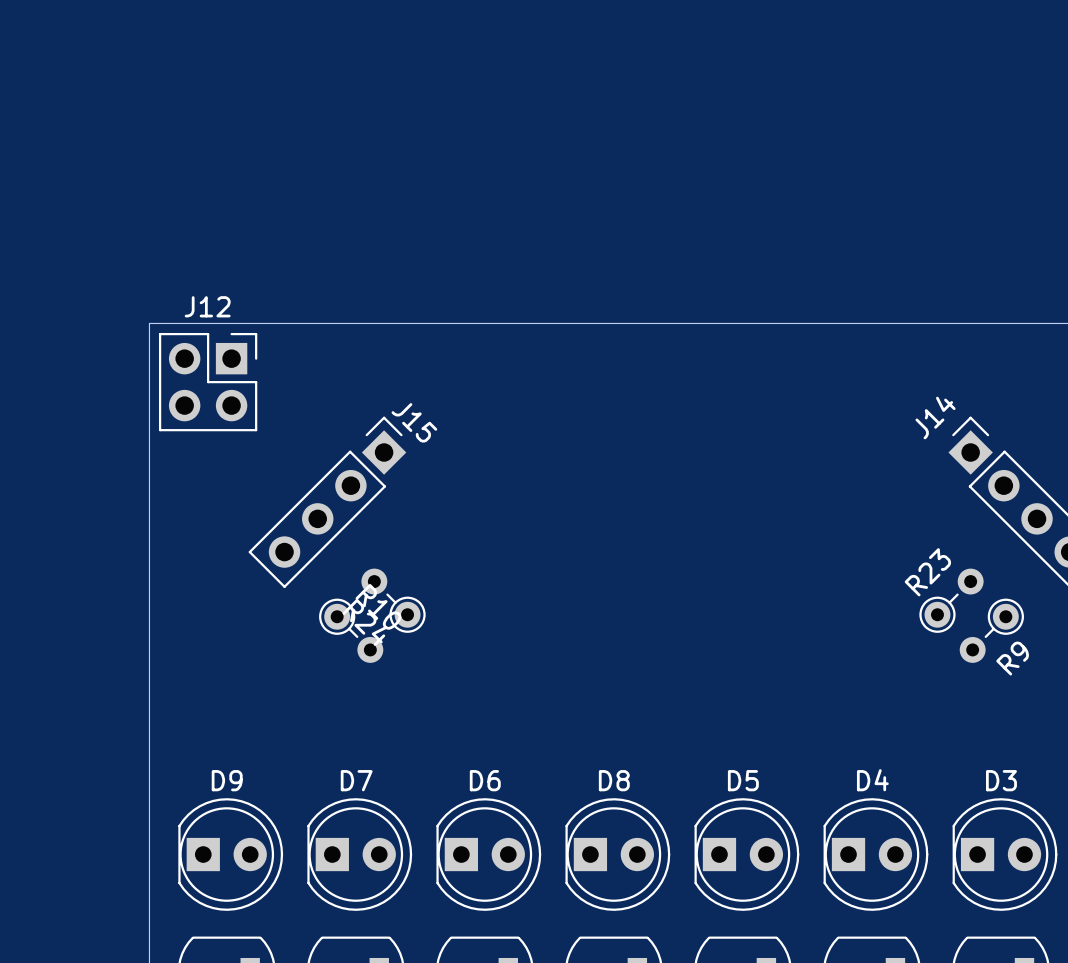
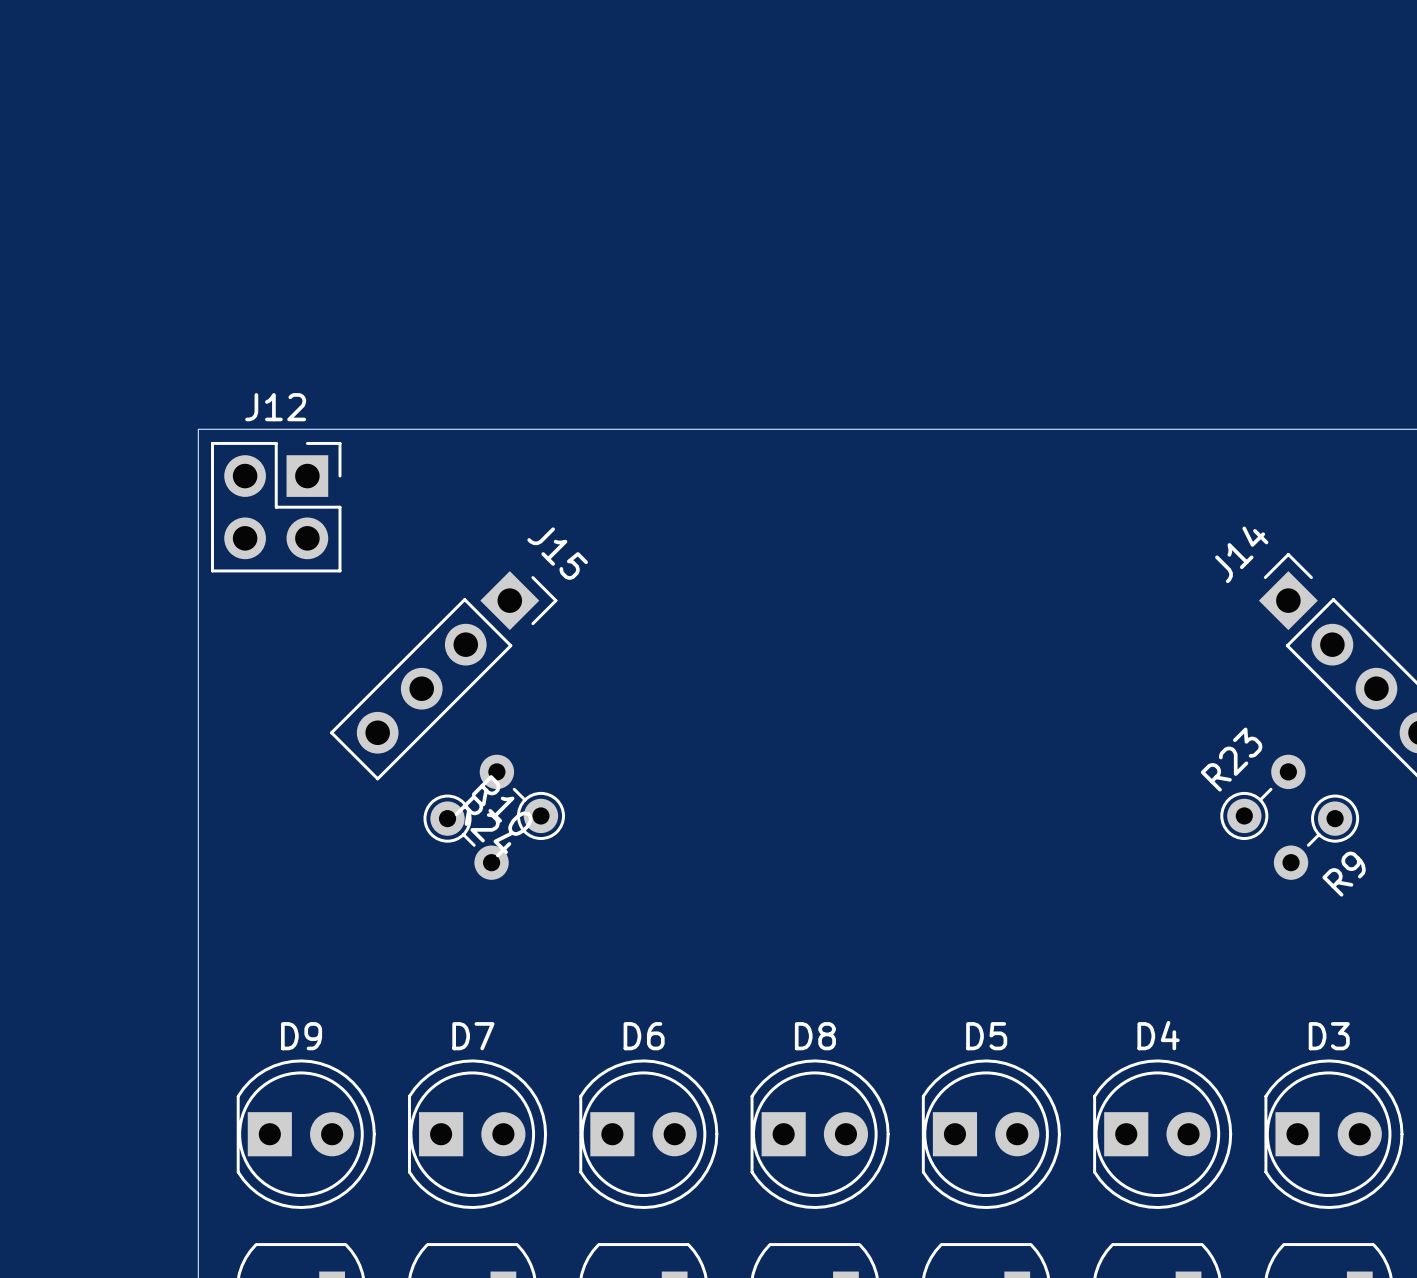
J15 footprint: [248, 416, 407, 588] -> [330, 571, 558, 781]

